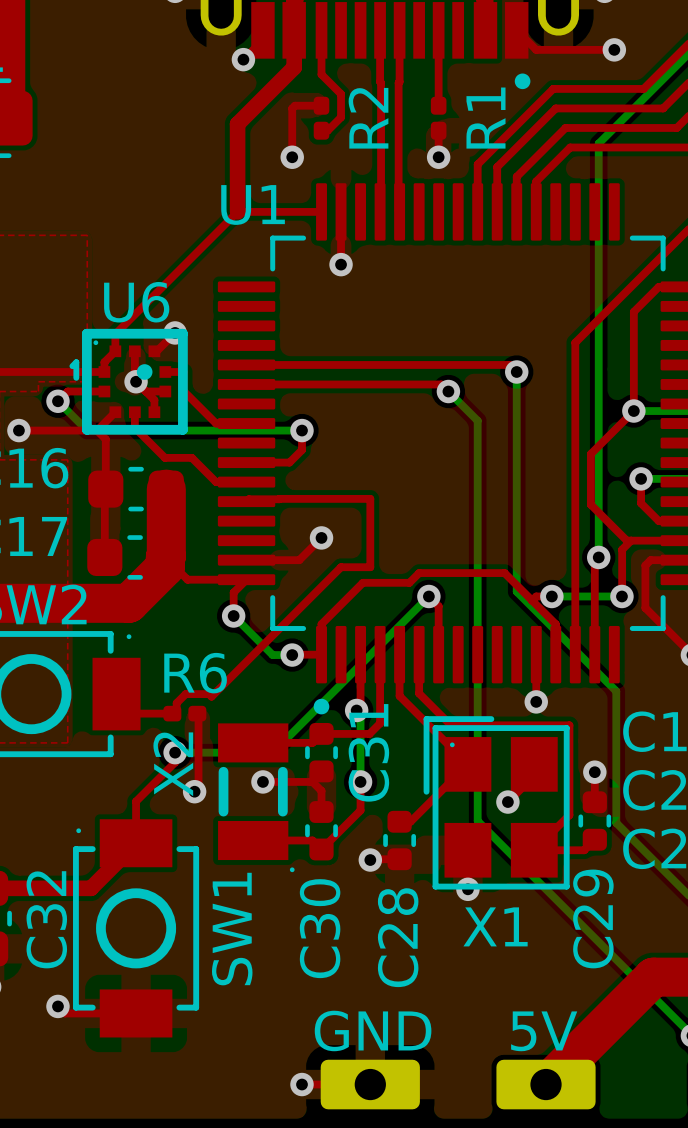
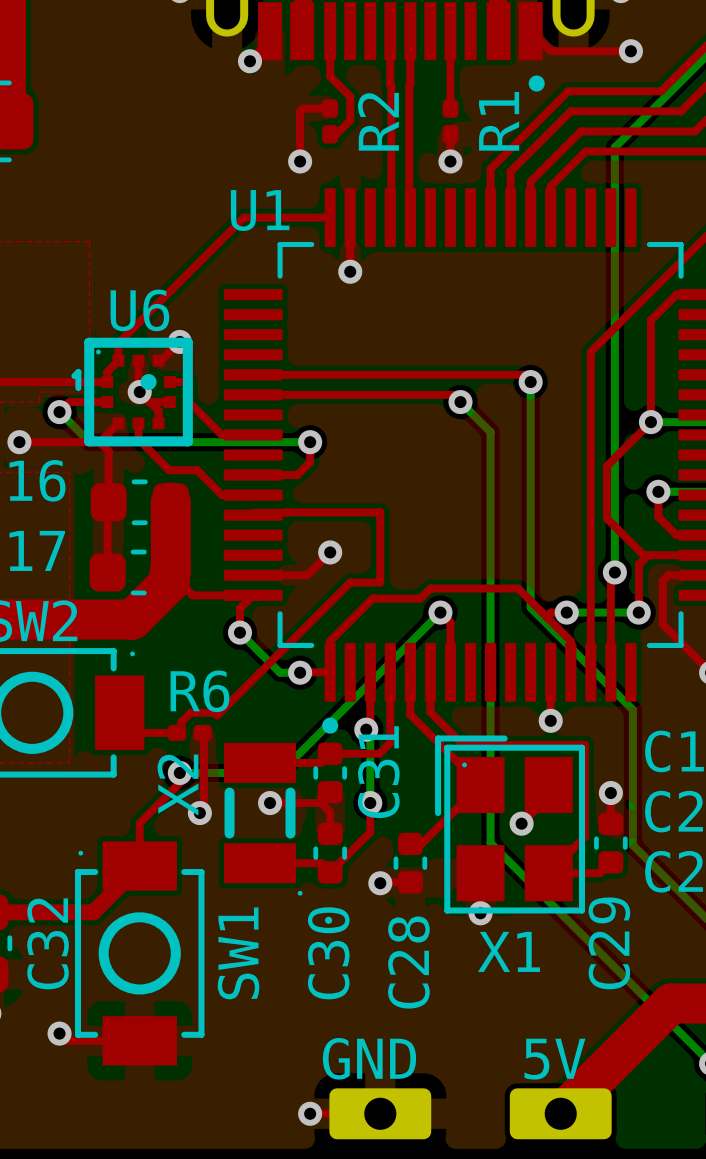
top track: (294, 30) (294, 67) (237, 124) (237, 211) -> none

